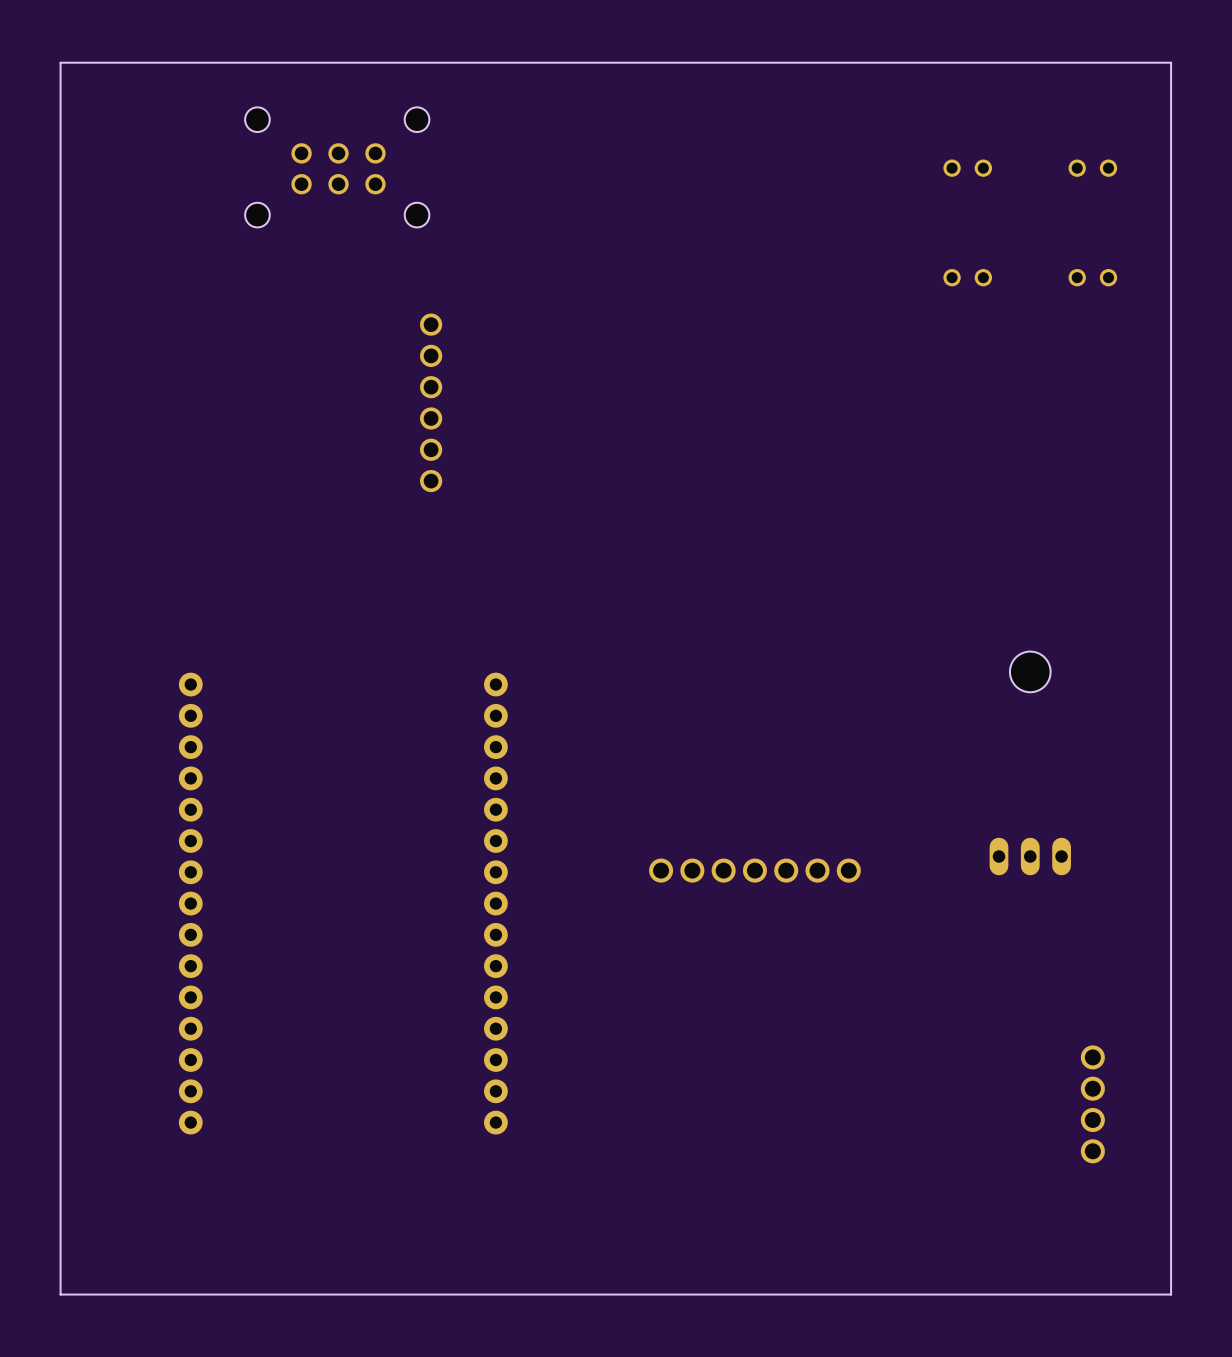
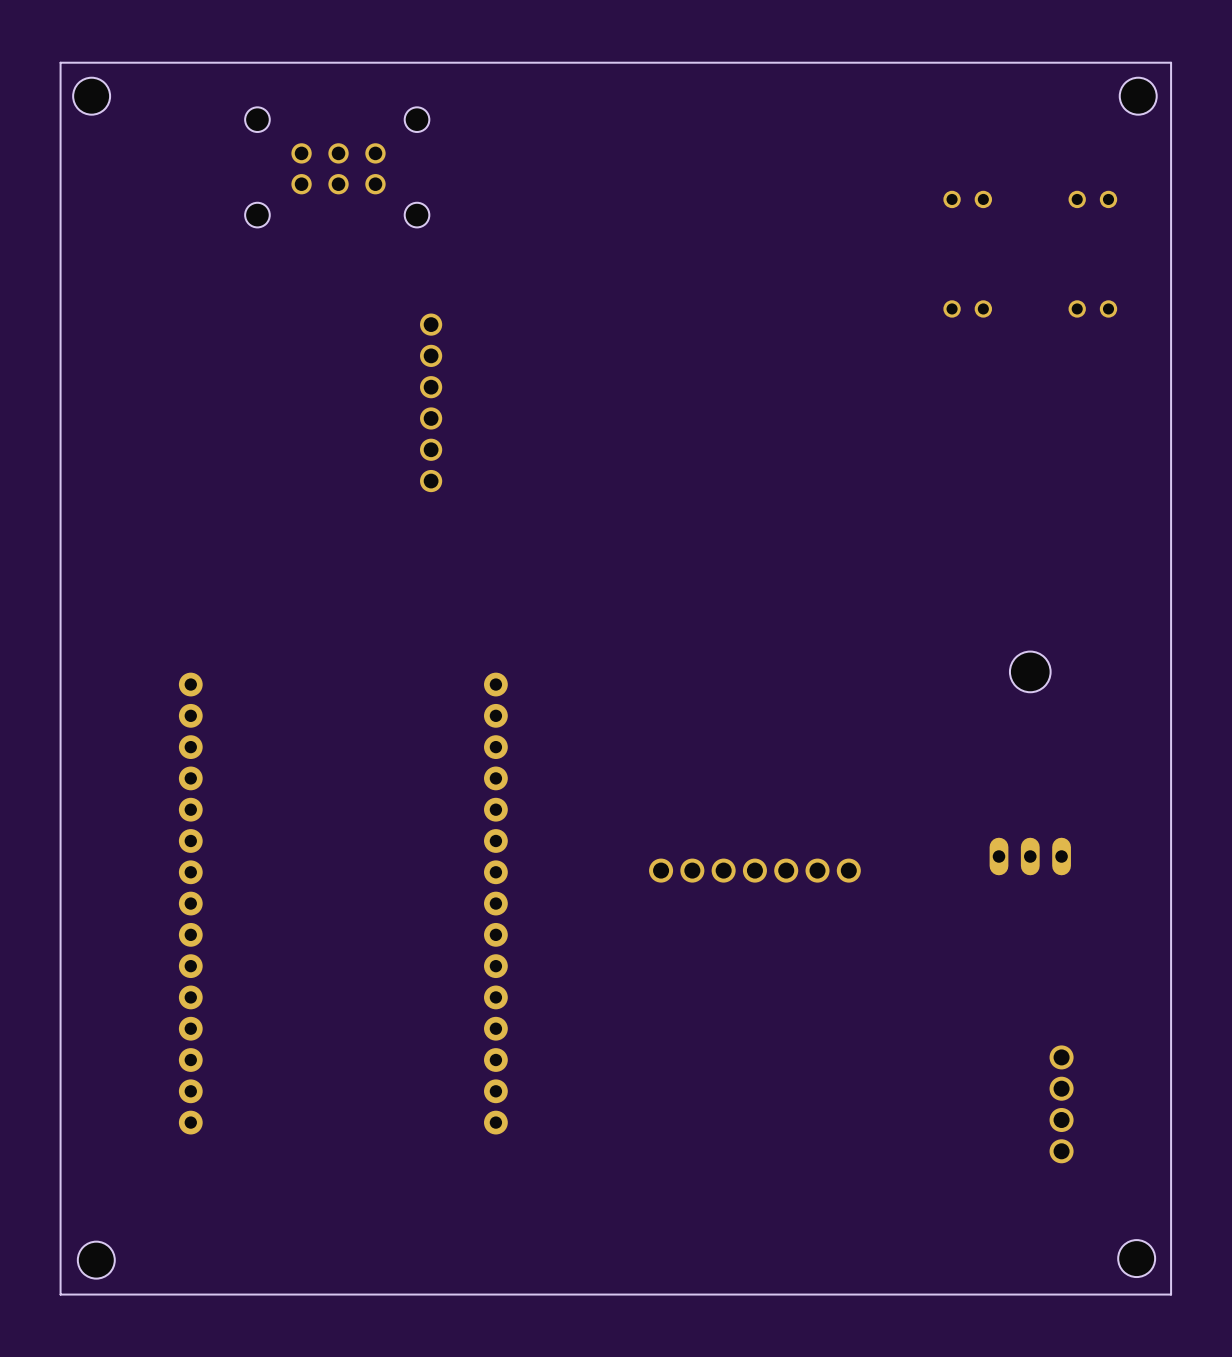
hole: none -> (91, 96)
hole: none -> (1138, 96)
part position: (967, 168) -> (967, 199)
part position: (1092, 168) -> (1092, 199)
part position: (967, 277) -> (967, 308)
part position: (1092, 277) -> (1092, 308)
part position: (1092, 1104) -> (1061, 1104)
hole: none -> (1136, 1258)
hole: none -> (96, 1260)

